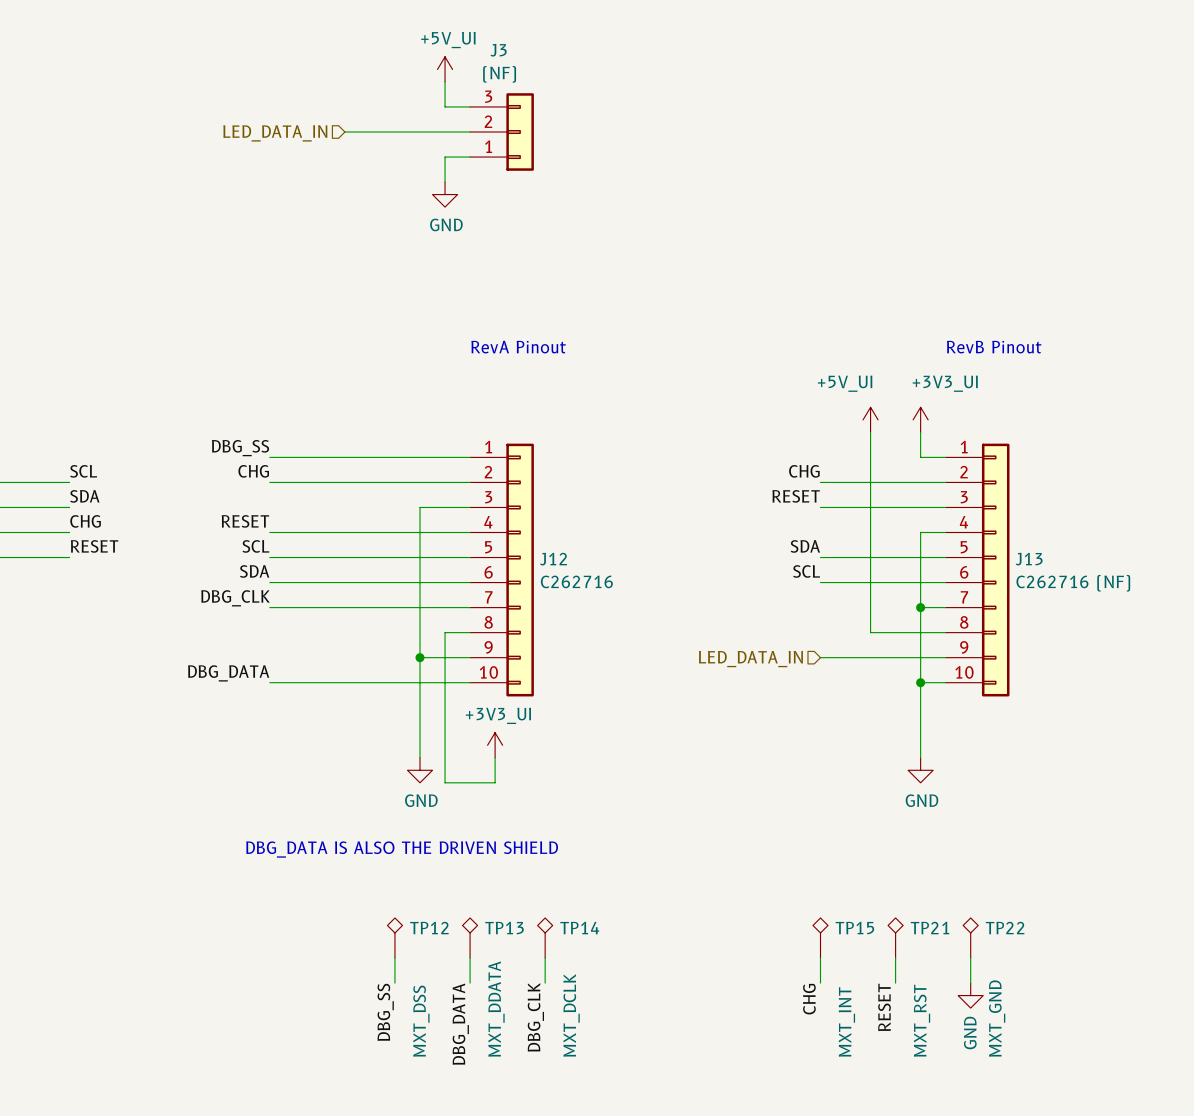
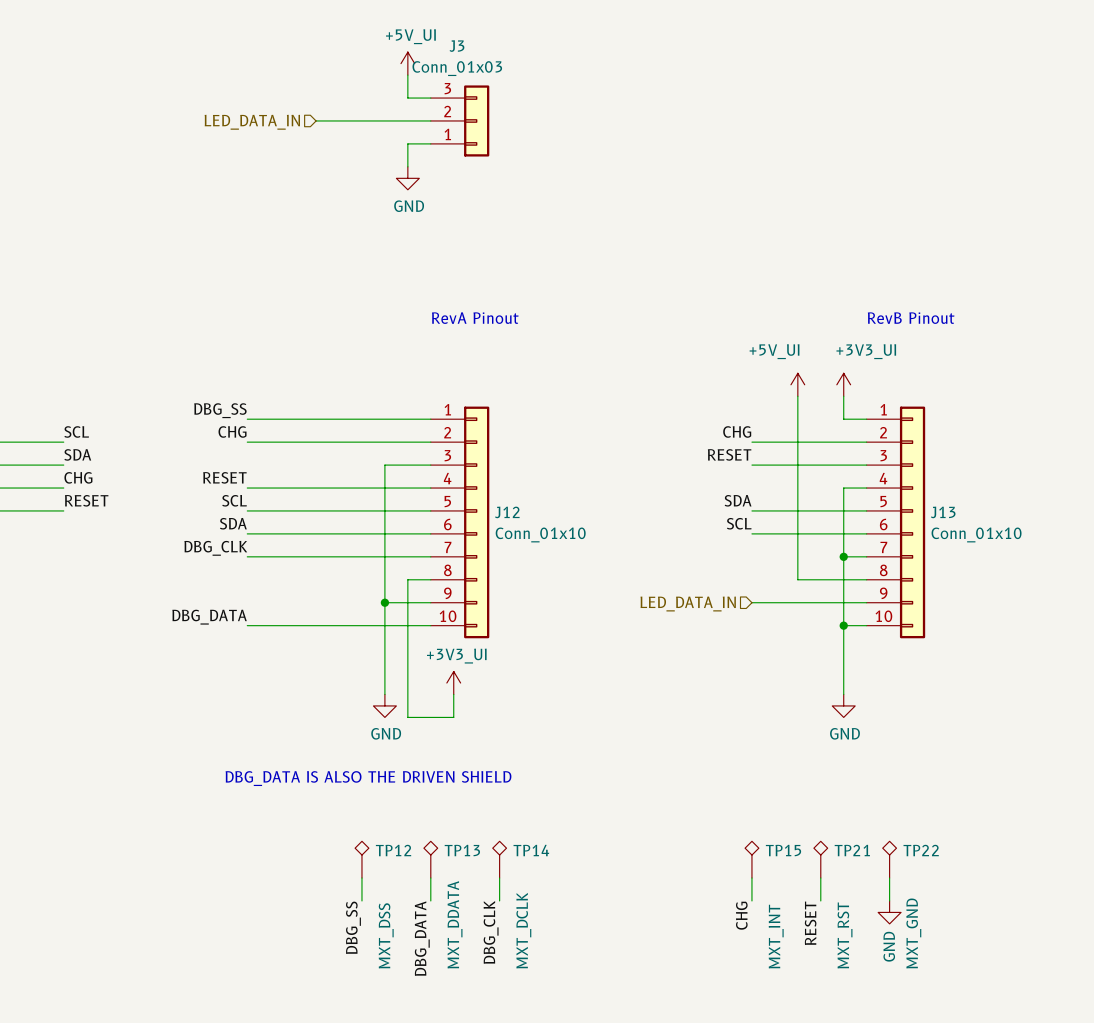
J3 value: (NF) (499, 74) -> Conn_01x03 (457, 68)
J12 value: C262716 (576, 581) -> Conn_01x10 (540, 534)
J13 value: C262716 (NF) (1073, 583) -> Conn_01x10 (976, 534)

